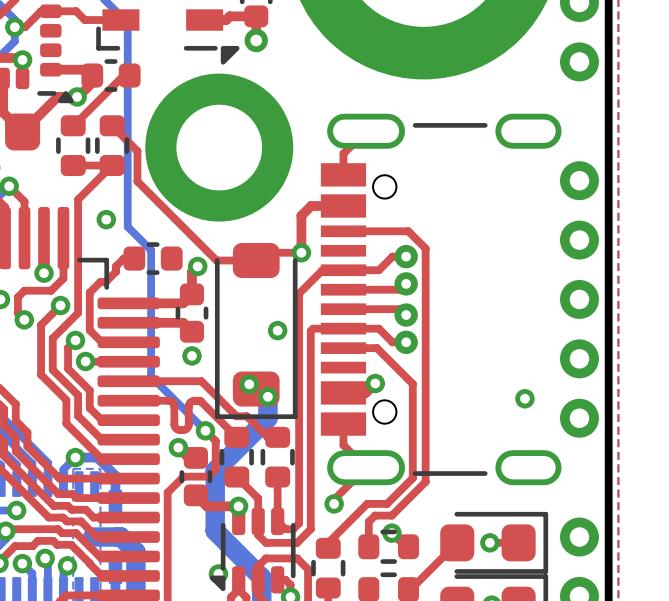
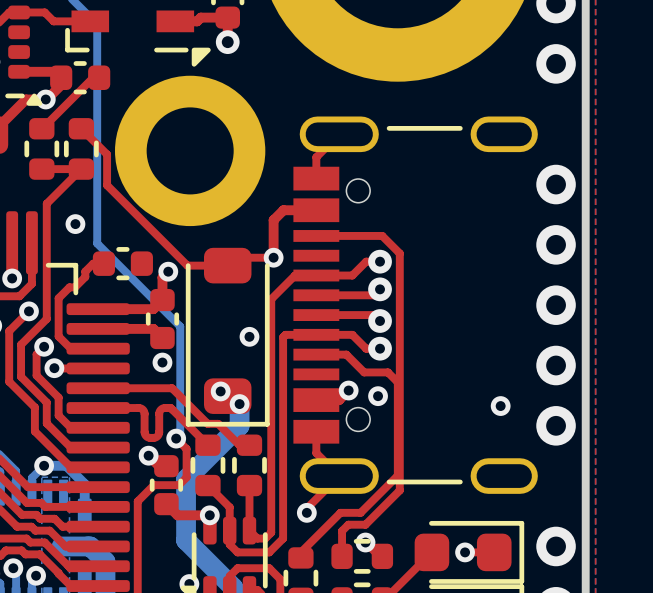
bottom track: (127, 226) (151, 250) (151, 376) (205, 430) -> (97, 231) (97, 243) (180, 326) (180, 434) (176, 438)
top track: (373, 348) (376, 348) (412, 383) (412, 478) -> (346, 354) (364, 372) (387, 372) (397, 382) (397, 475) (386, 486)
via: none -> (378, 396)

